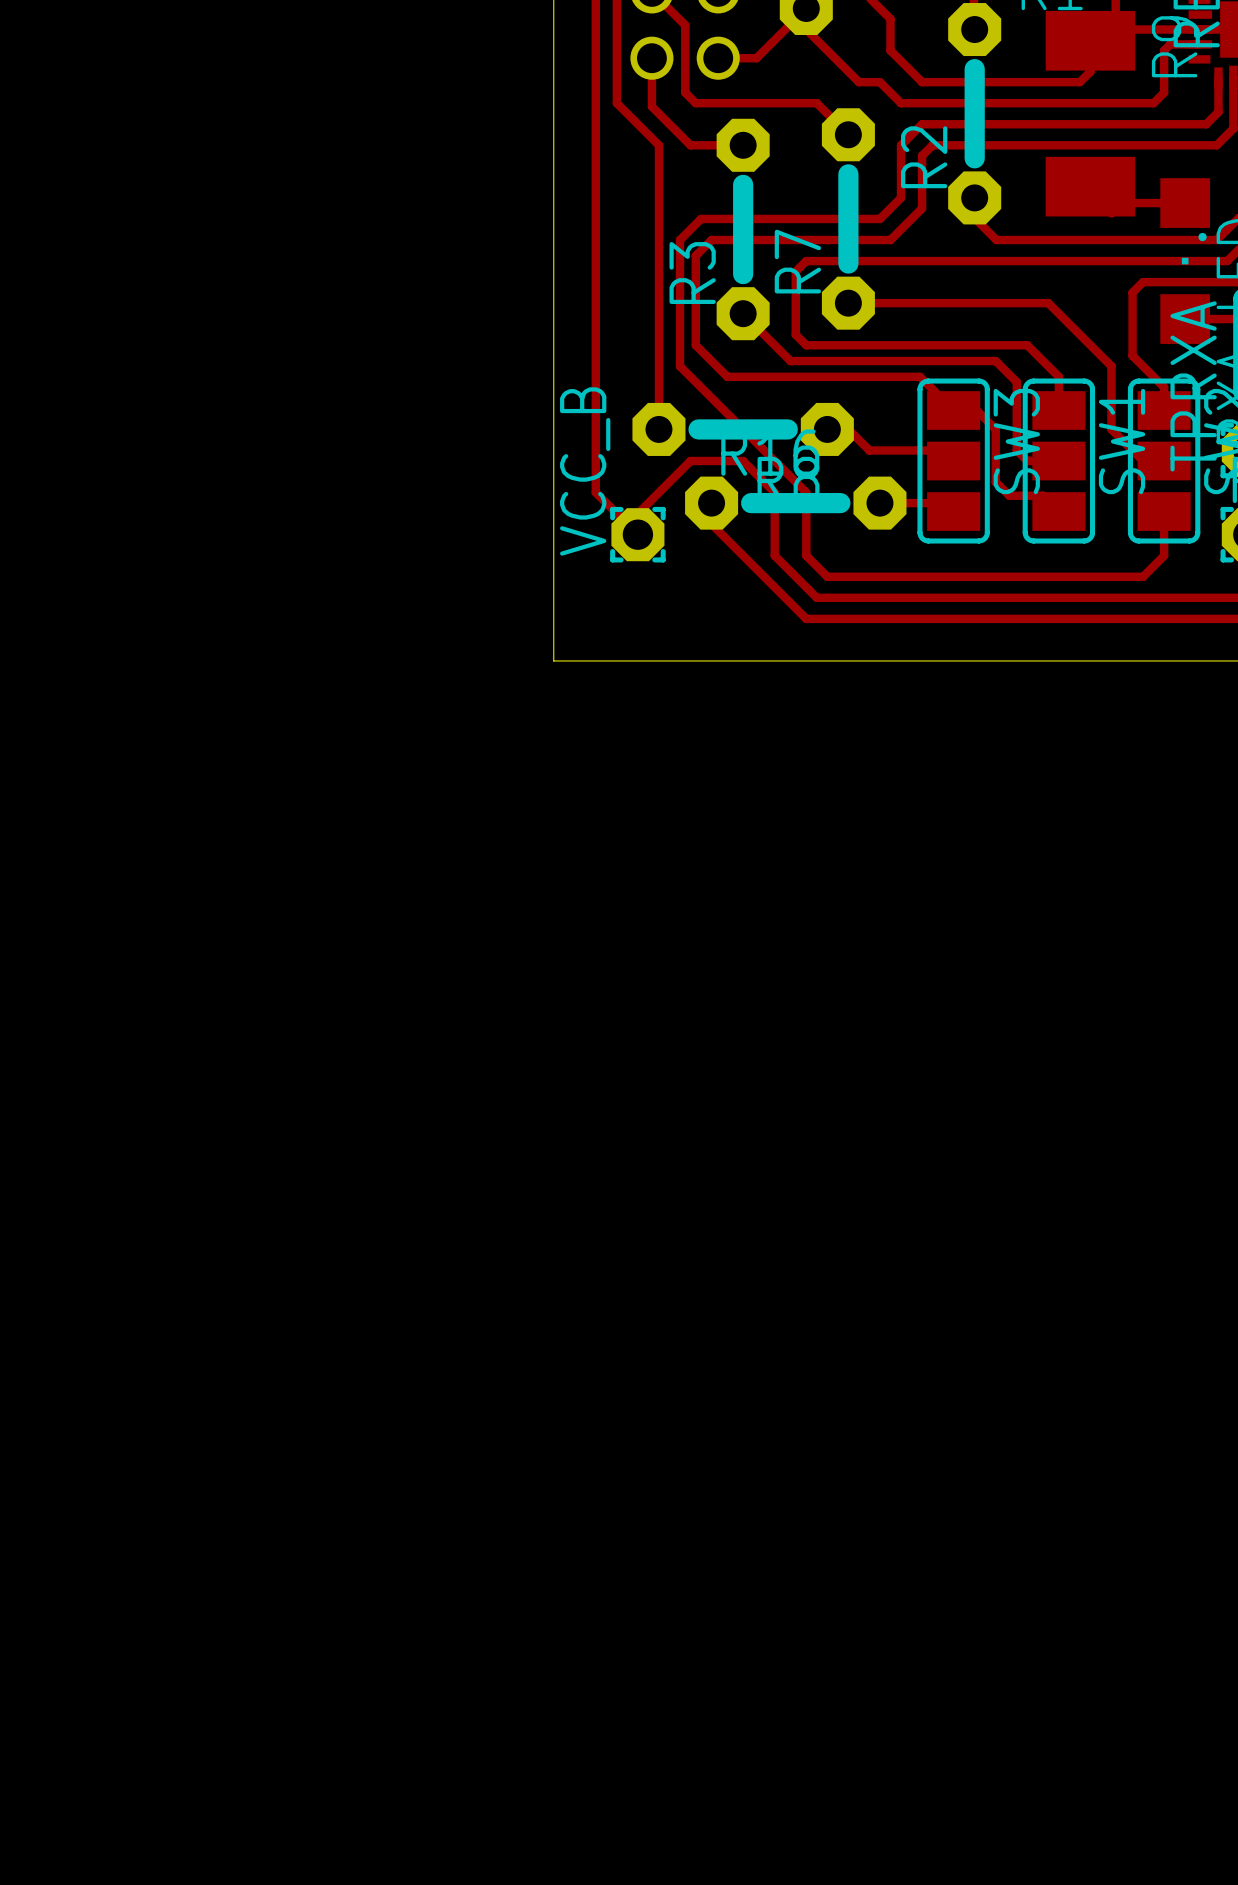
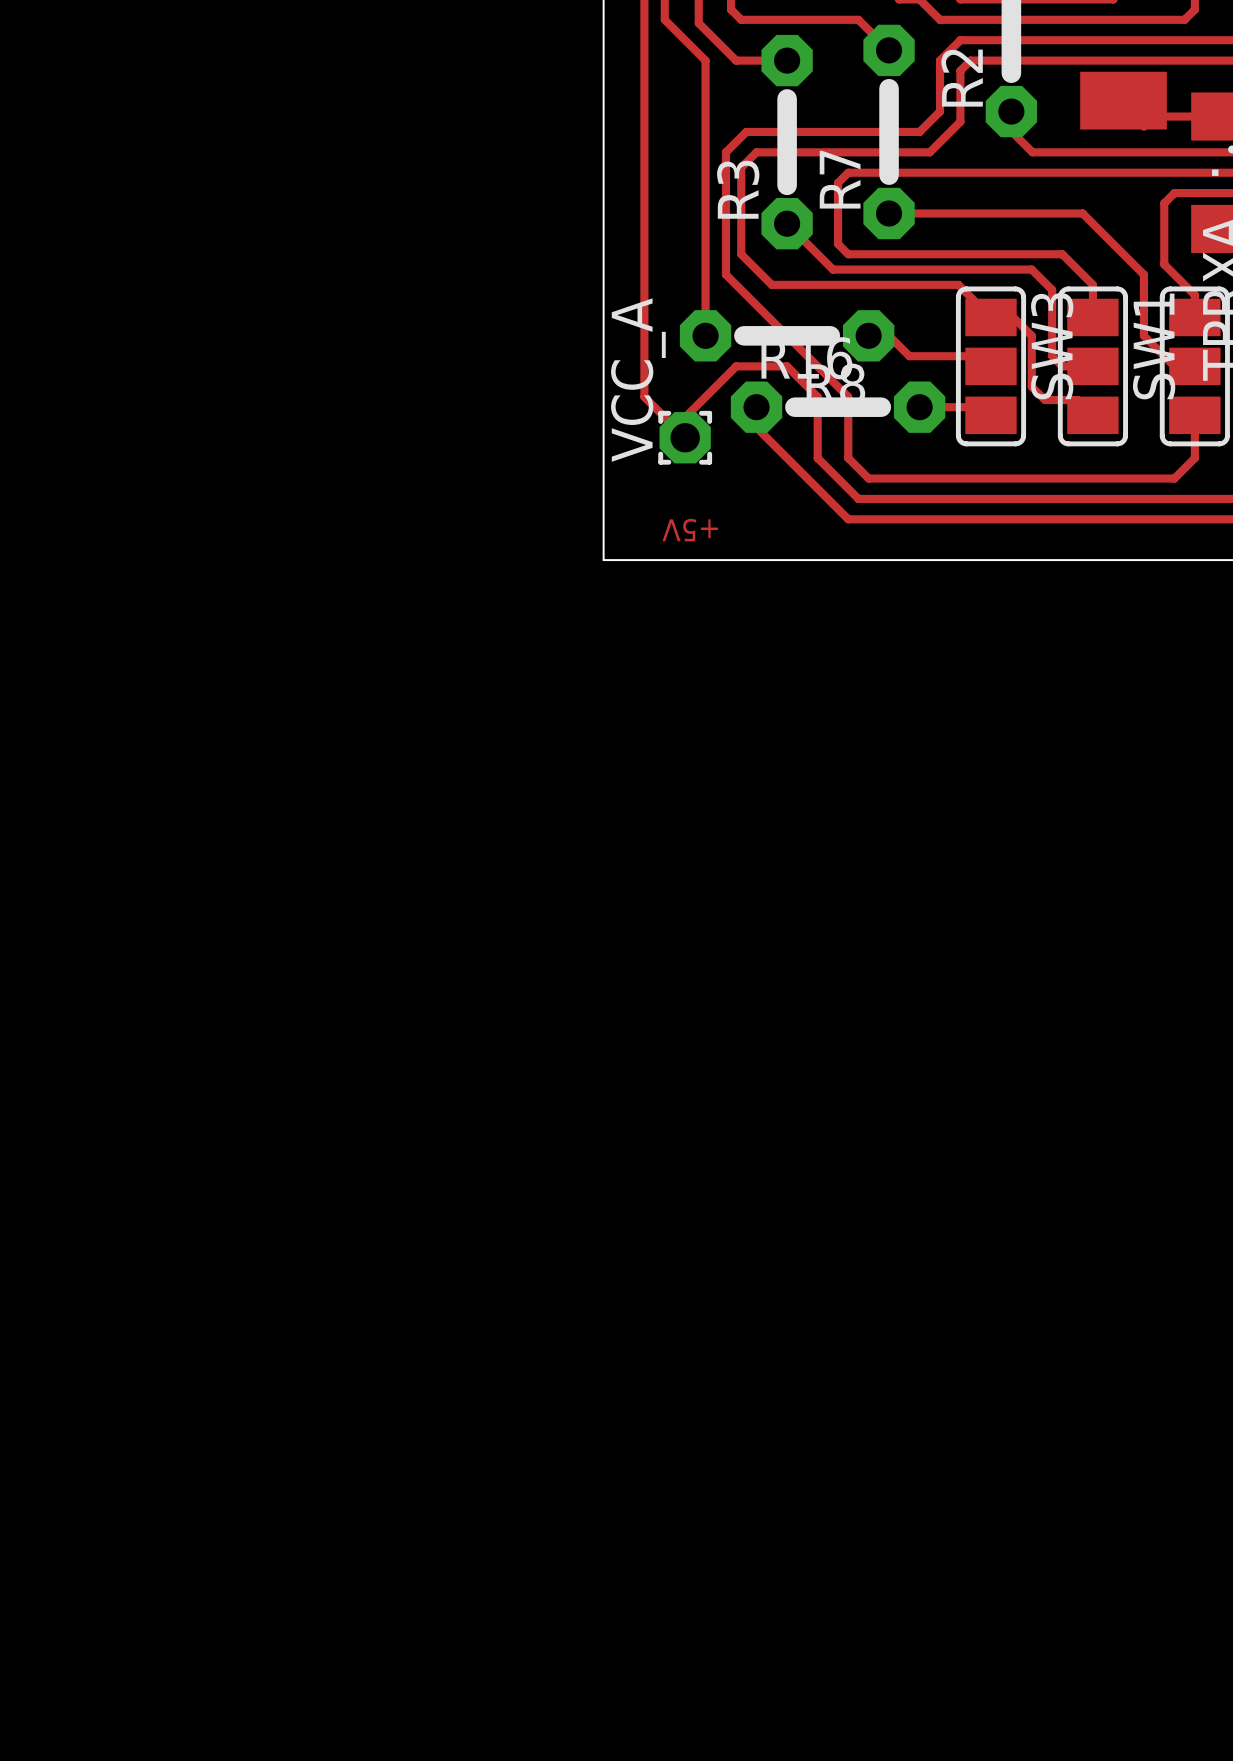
VCC_B name: VCC_B (585, 471) -> VCC_A (638, 380)
text: none -> +5V (690, 530)

